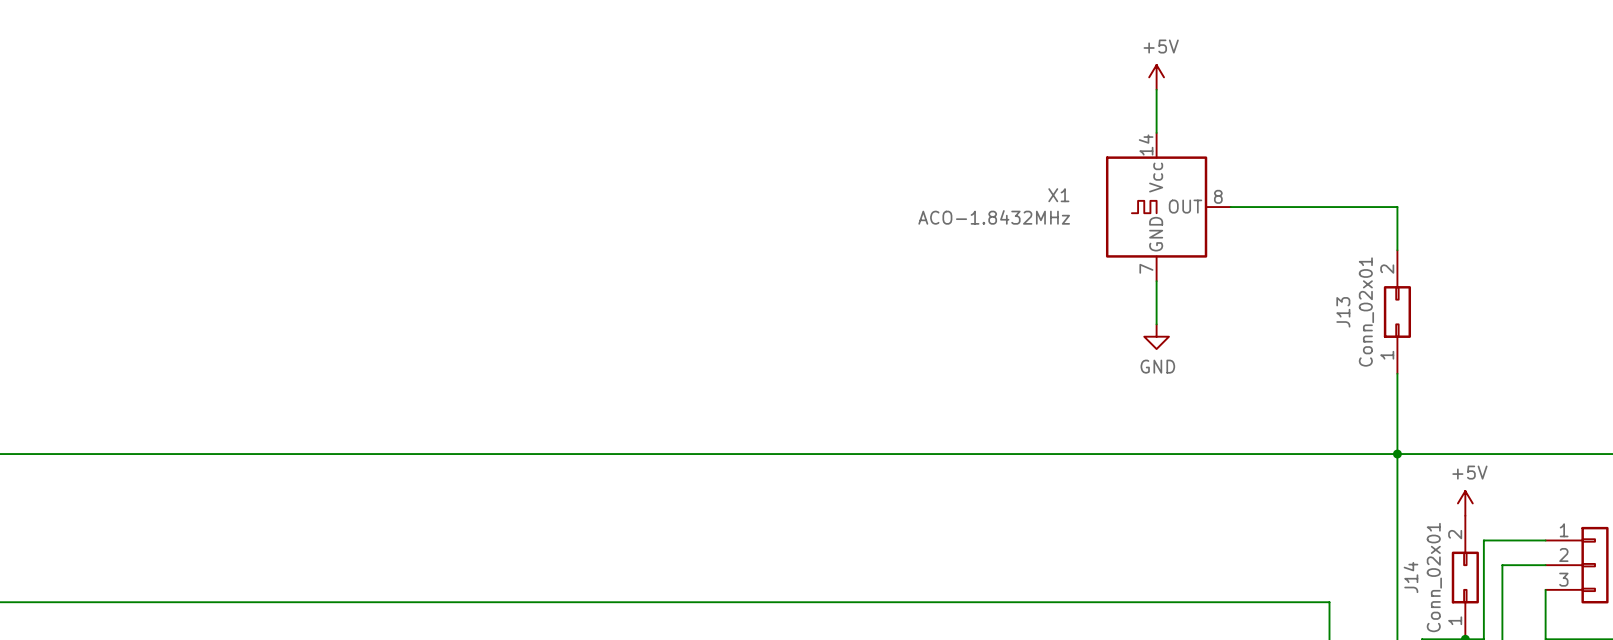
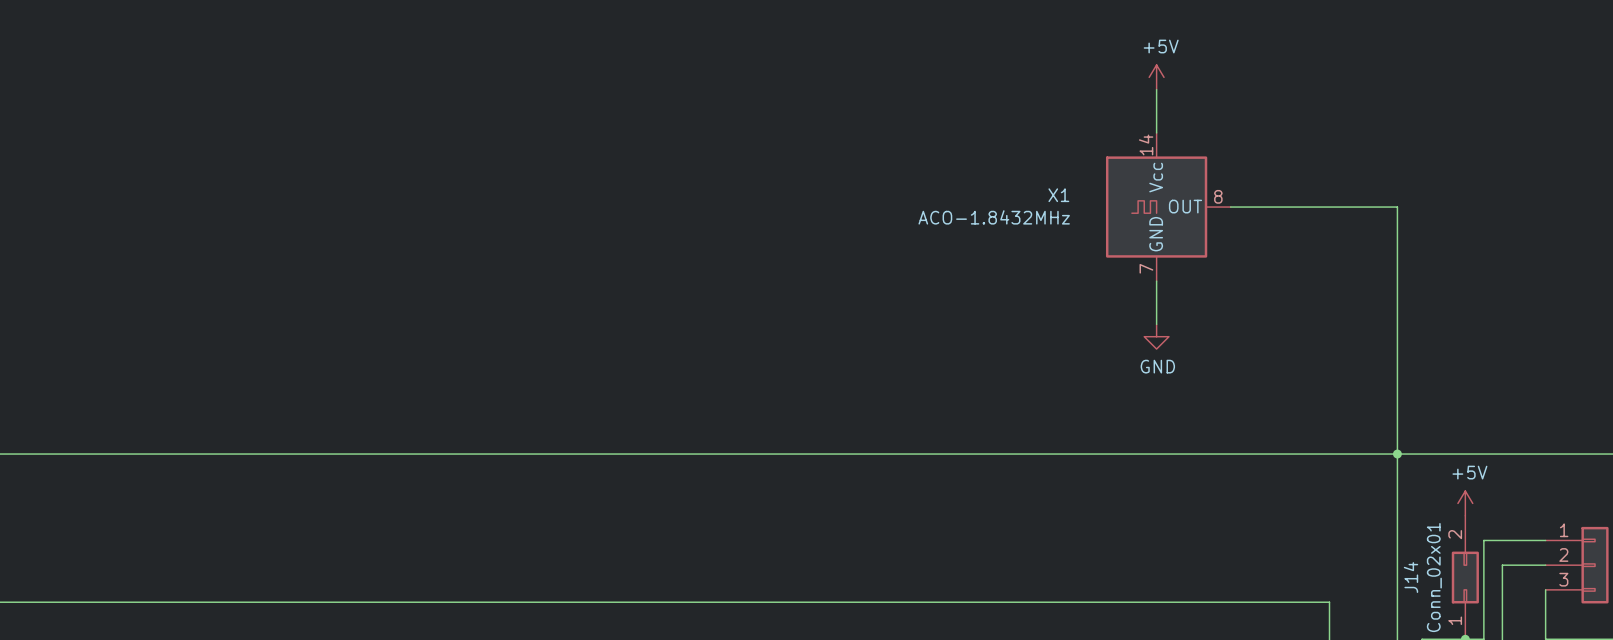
J13: Conn_02x01 (1397, 312) -> none

